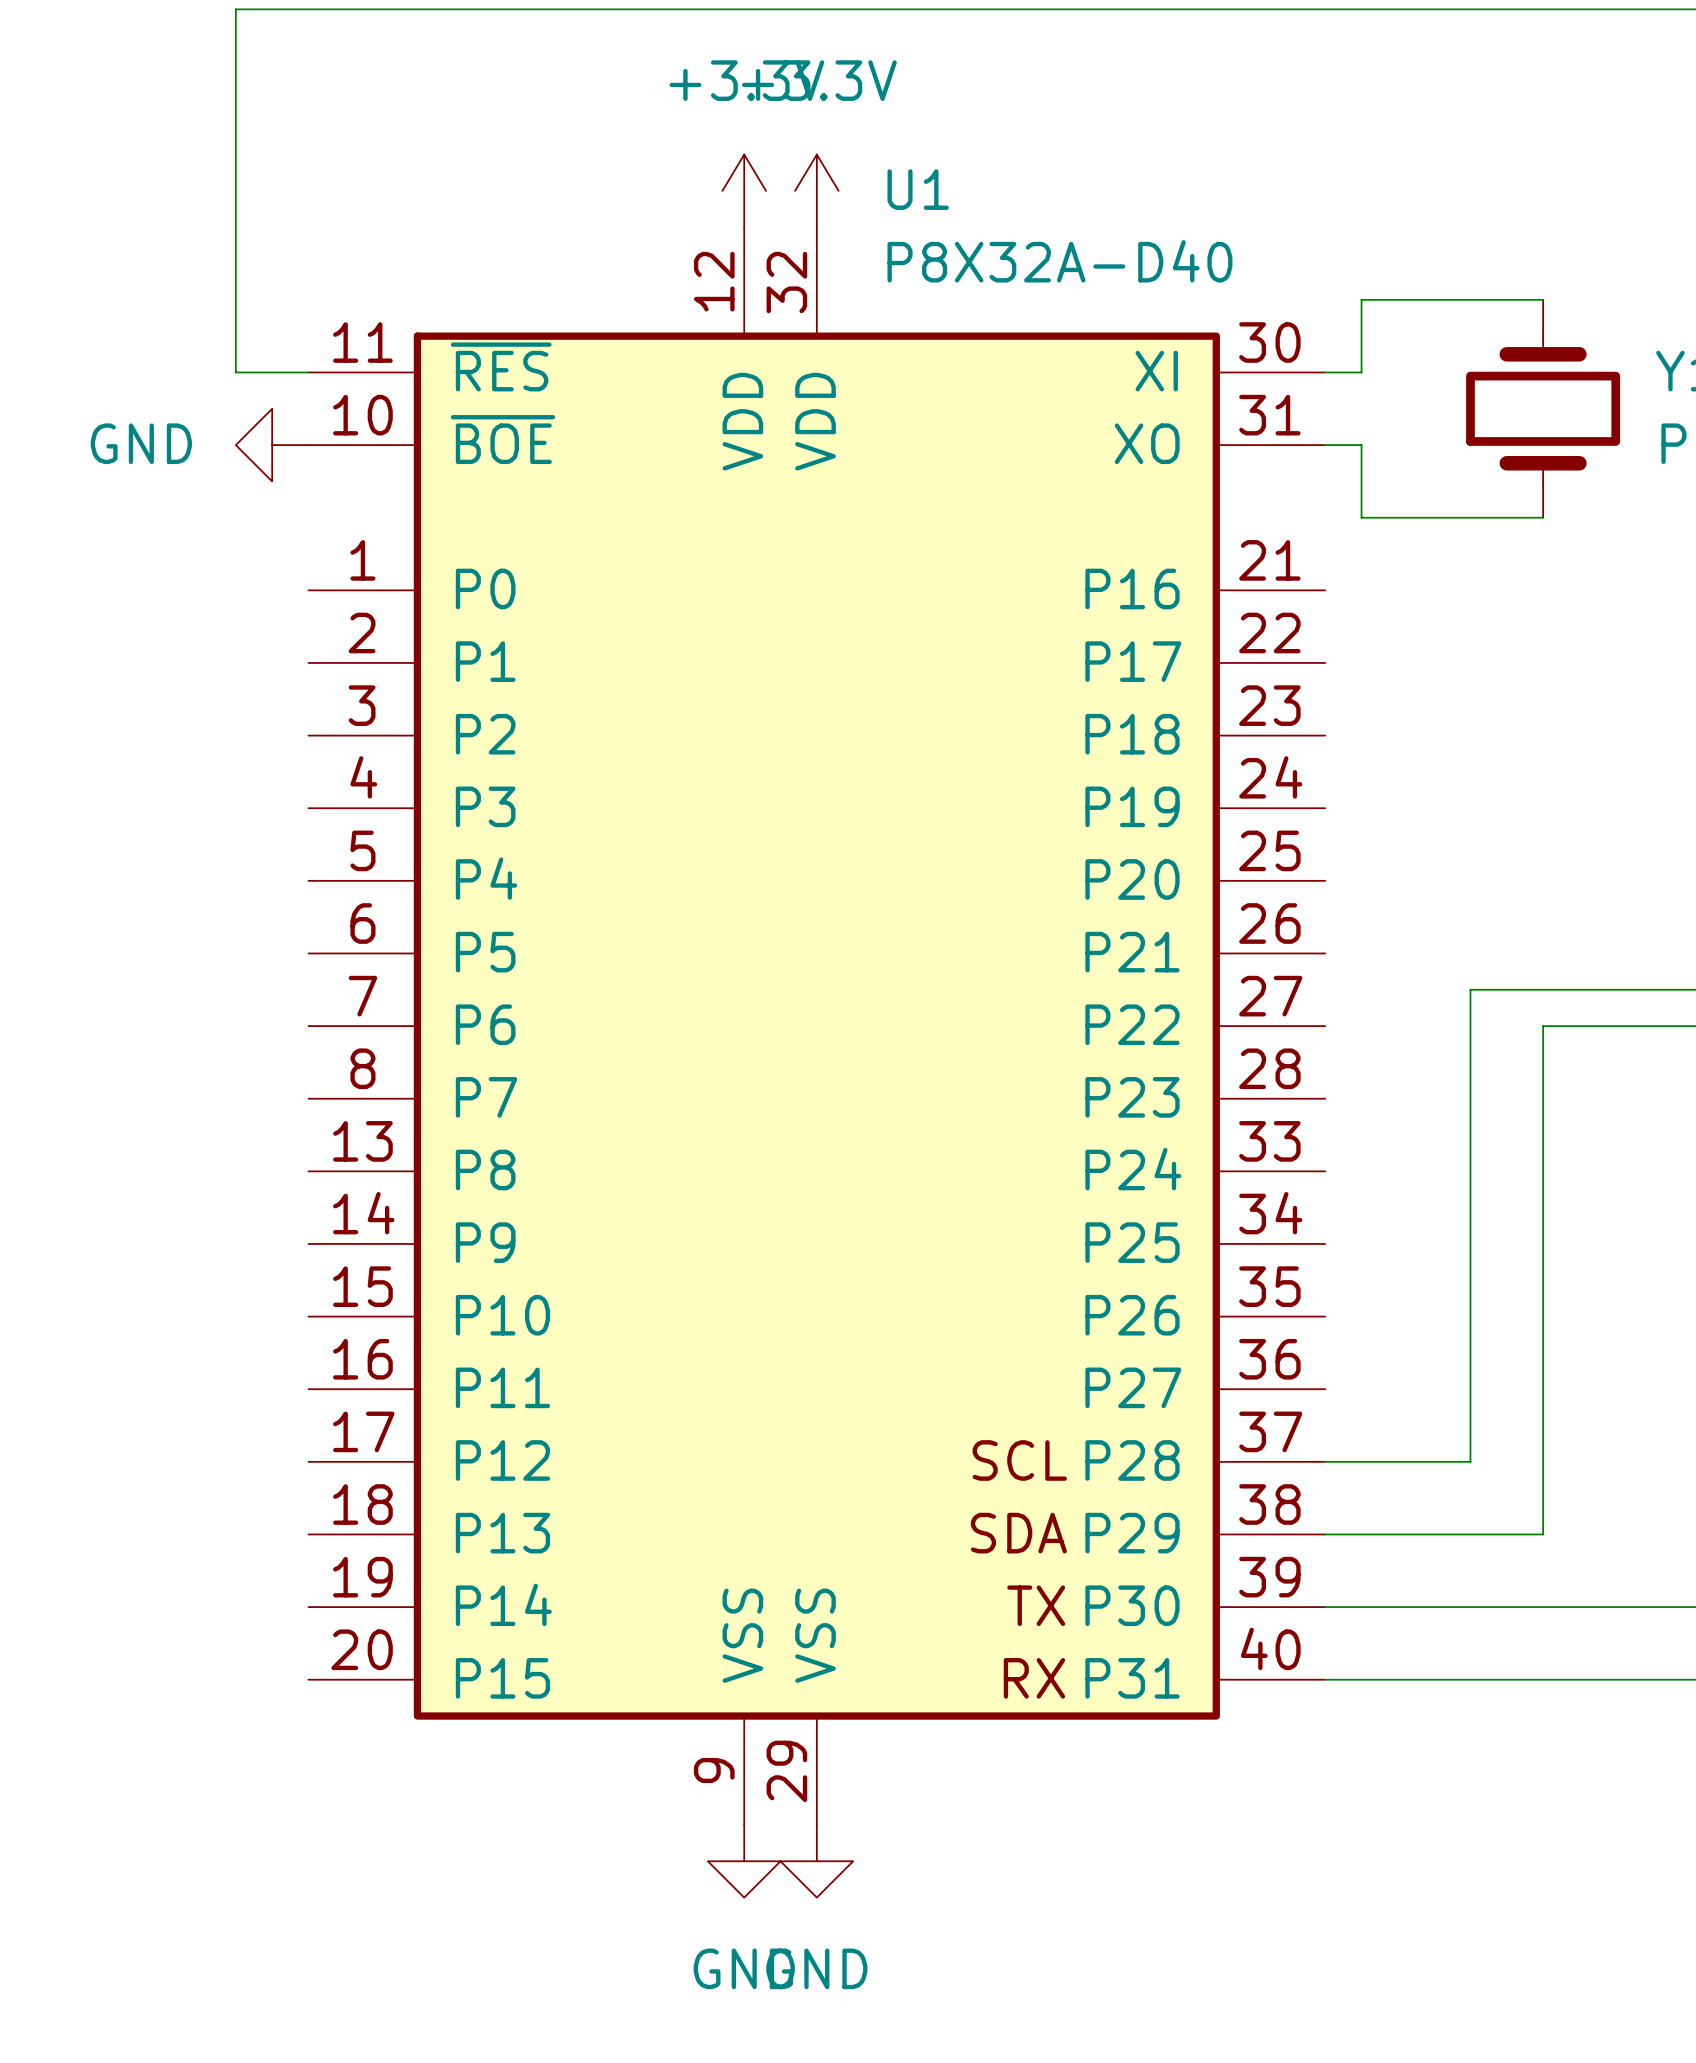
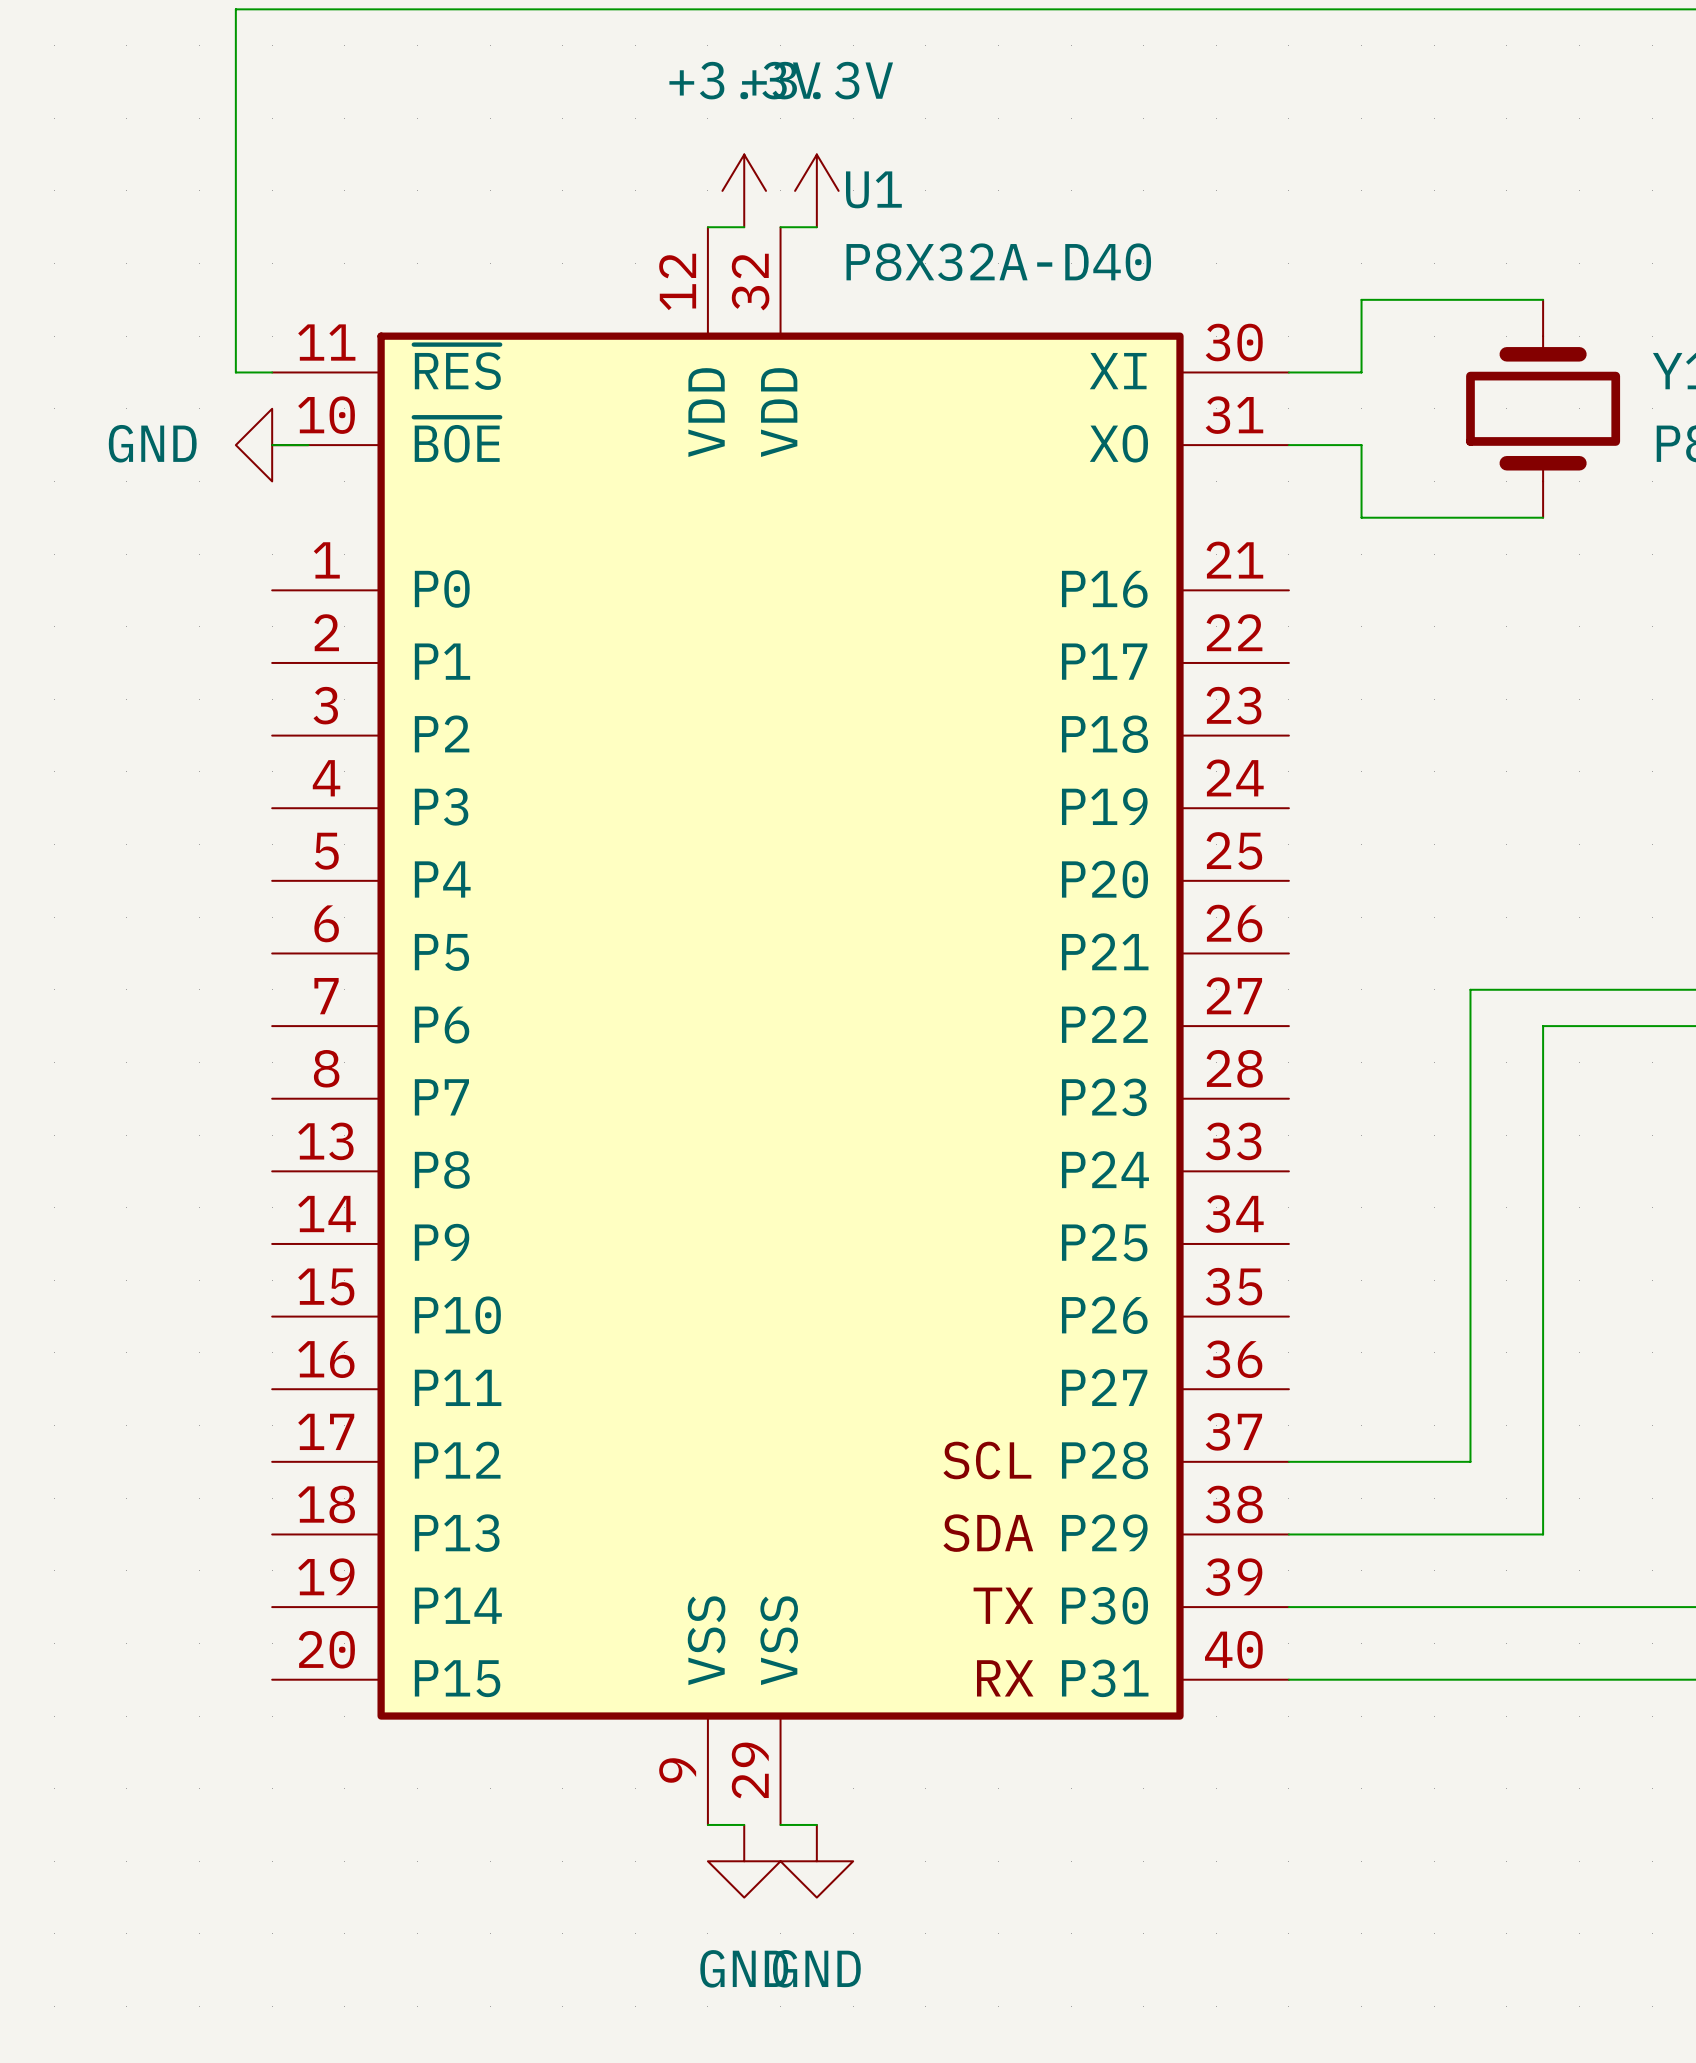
wire: none -> (707, 227) (744, 227)
wire: none -> (780, 227) (816, 227)
U1 position: (816, 1026) -> (780, 1026)
wire: none -> (707, 1824) (744, 1824)
wire: none -> (780, 1824) (816, 1824)

